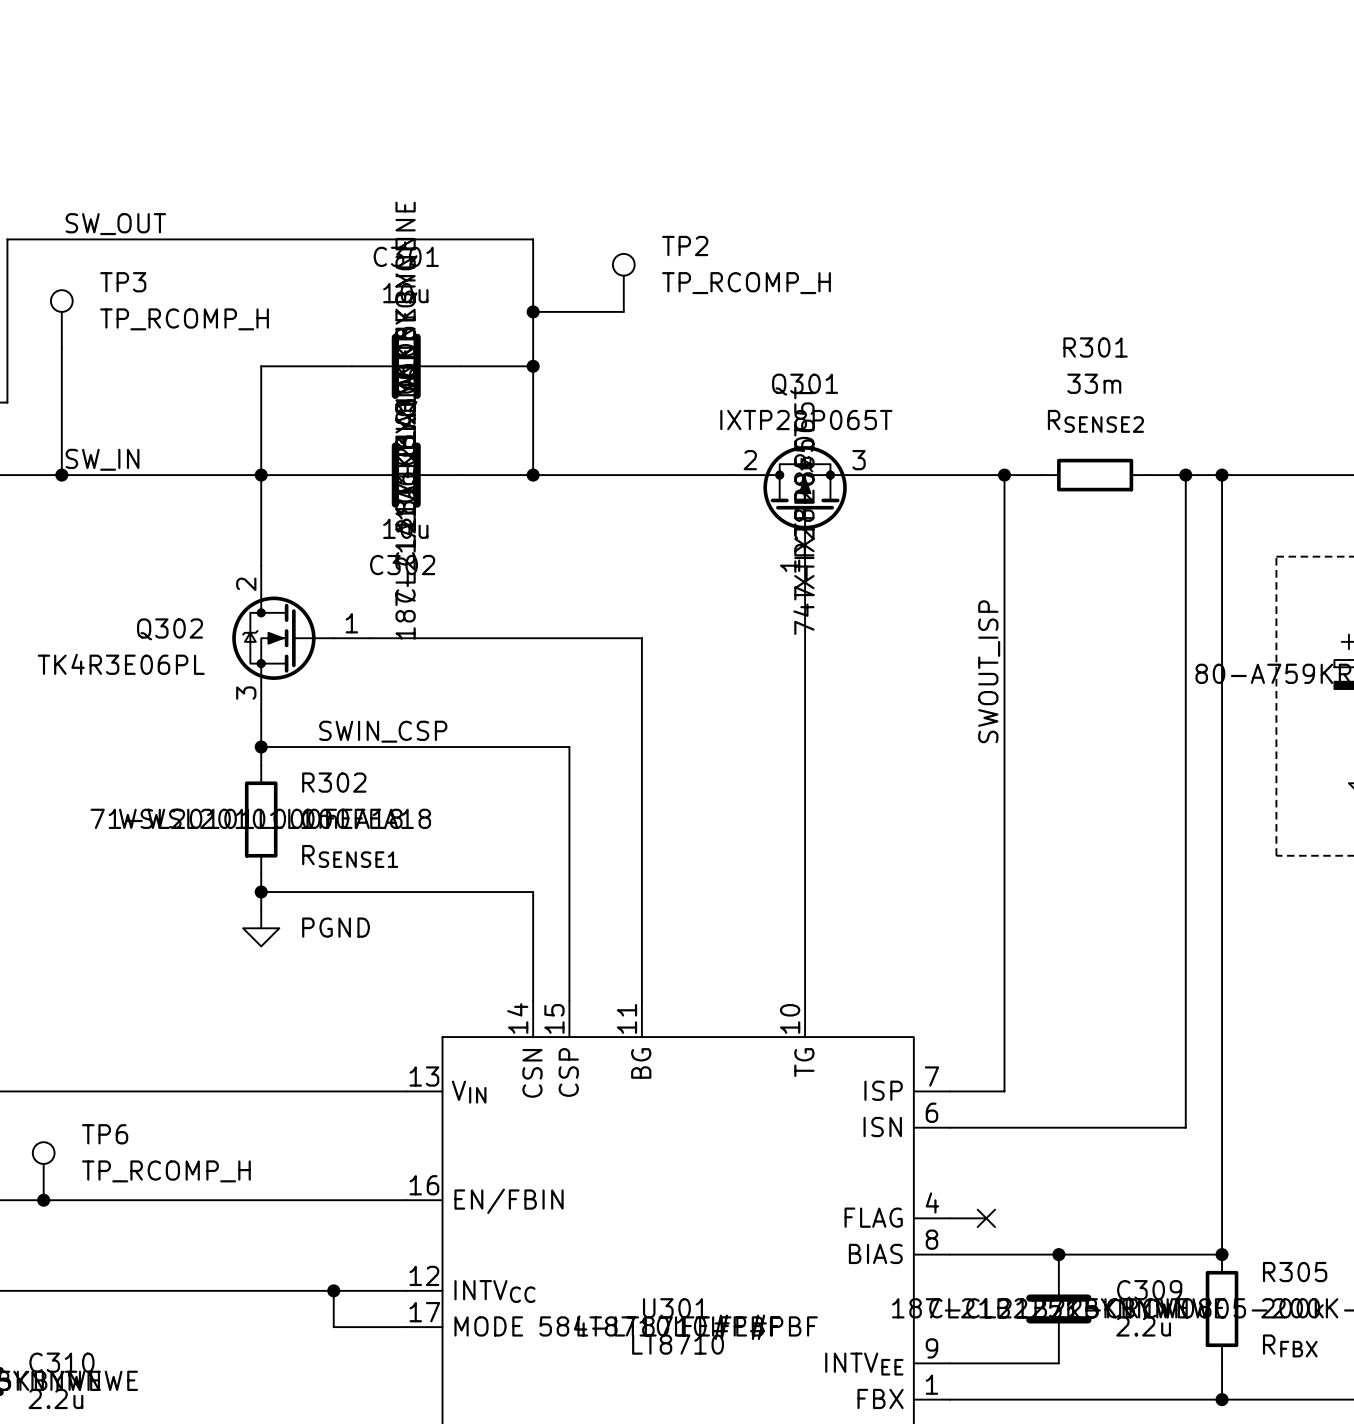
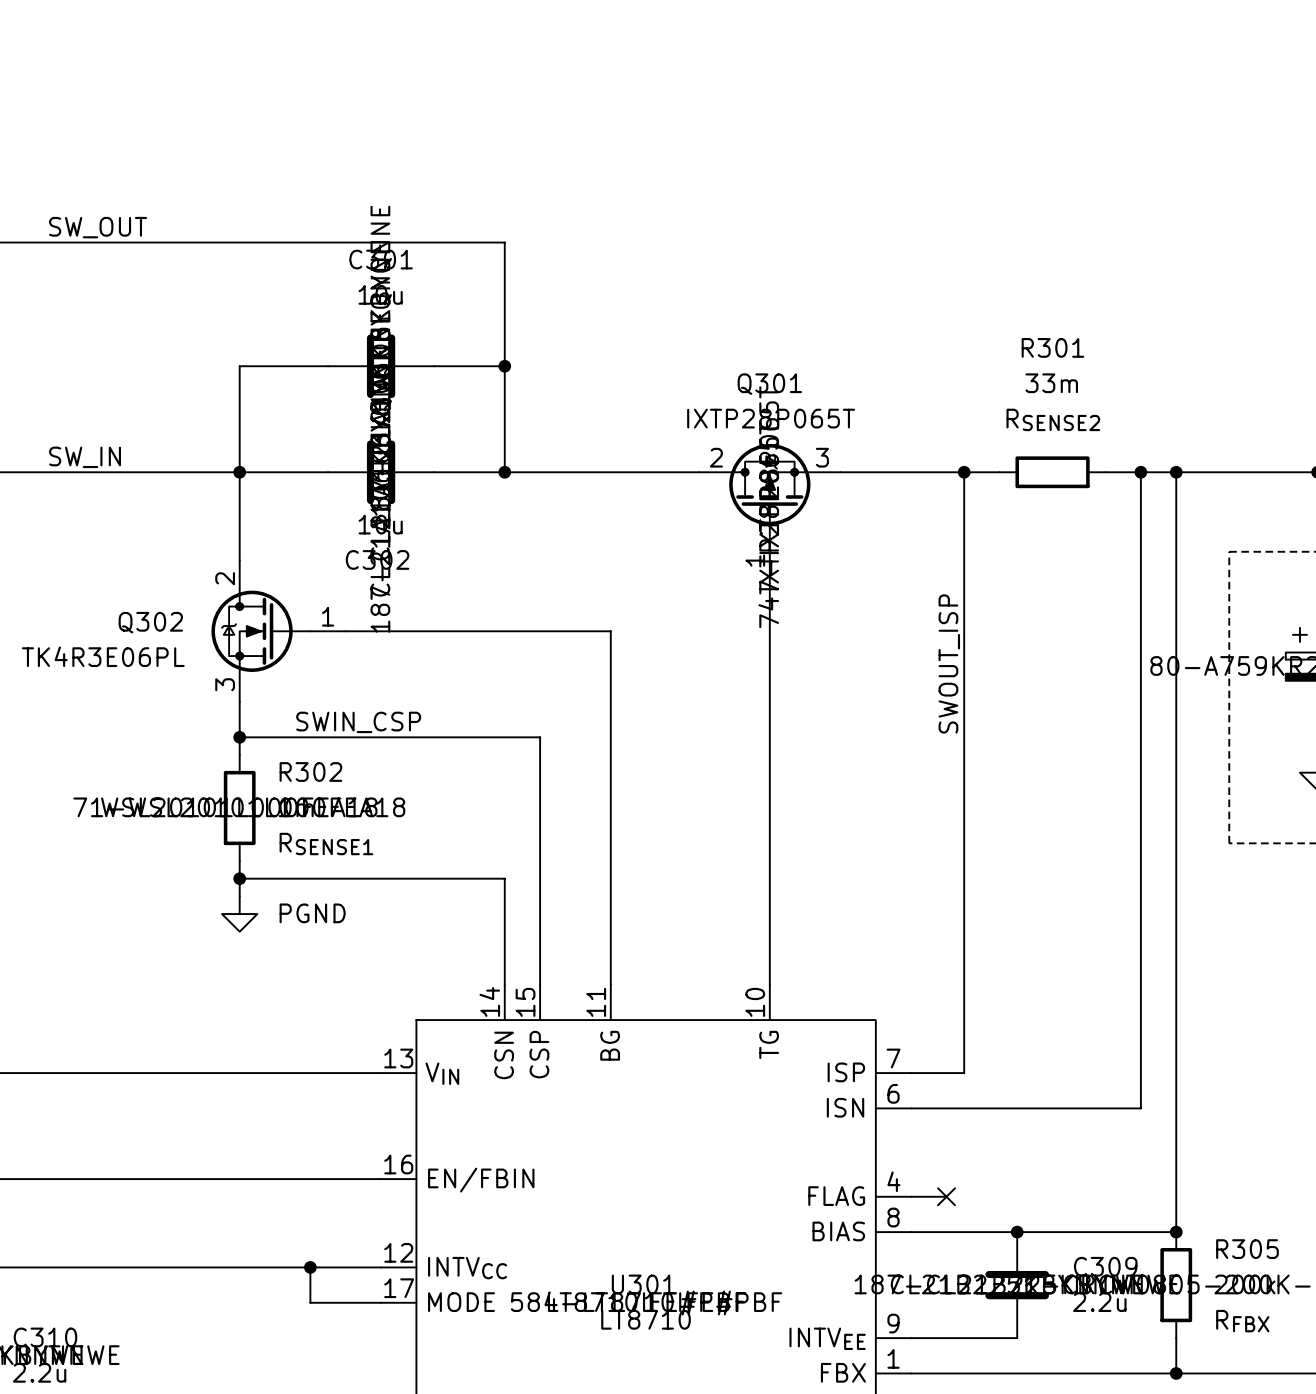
TP2: TP_RCOMP_H (623, 282) -> none
wire: (533, 311) (623, 311) -> none
junction: (533, 311) -> none
TP3: TP_RCOMP_H (61, 319) -> none
wire: (61, 348) (61, 475) -> none
junction: (61, 475) -> none
TP6: TP_RCOMP_H (43, 1171) -> none
junction: (43, 1200) -> none

